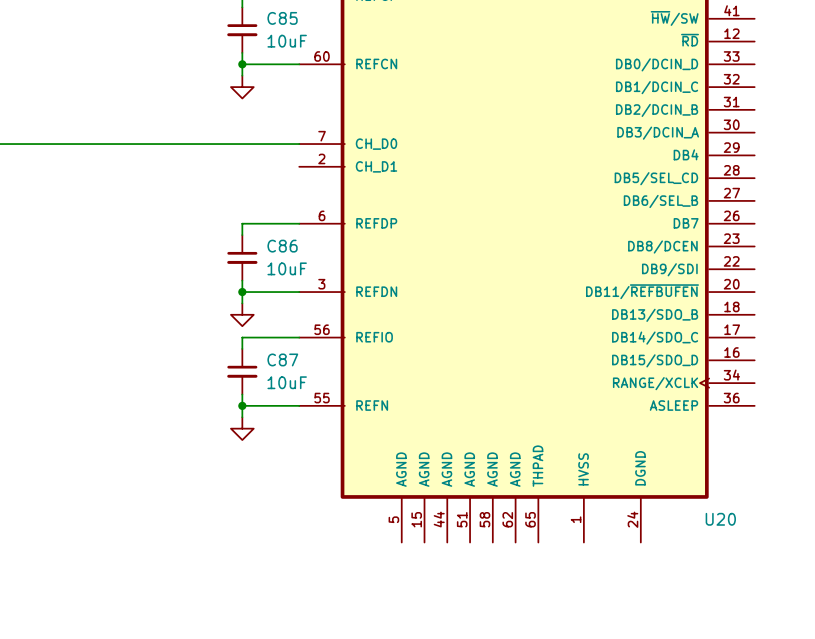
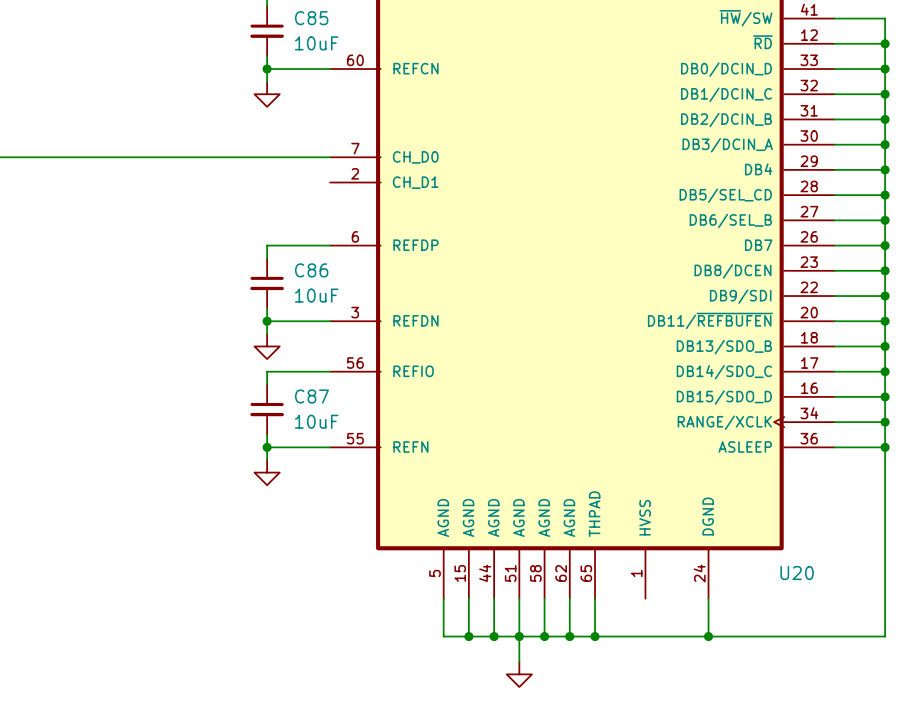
wire: none -> (834, 18) (885, 18) (885, 636) (443, 636) (443, 598)
wire: none -> (834, 43) (885, 43)
junction: none -> (885, 43)
wire: none -> (834, 69) (885, 69)
junction: none -> (885, 69)
wire: none -> (834, 94) (885, 94)
junction: none -> (885, 94)
wire: none -> (834, 119) (885, 119)
junction: none -> (885, 119)
wire: none -> (834, 144) (885, 144)
junction: none -> (885, 144)
wire: none -> (834, 169) (885, 169)
junction: none -> (885, 169)
wire: none -> (834, 195) (885, 195)
junction: none -> (885, 195)
wire: none -> (834, 220) (885, 220)
junction: none -> (885, 220)
wire: none -> (834, 245) (885, 245)
junction: none -> (885, 245)
wire: none -> (834, 270) (885, 270)
junction: none -> (885, 270)
wire: none -> (834, 296) (885, 296)
junction: none -> (885, 296)
wire: none -> (834, 321) (885, 321)
junction: none -> (885, 321)
wire: none -> (834, 346) (885, 346)
junction: none -> (885, 346)
wire: none -> (834, 371) (885, 371)
junction: none -> (885, 371)
wire: none -> (834, 396) (885, 396)
junction: none -> (885, 396)
wire: none -> (834, 422) (885, 422)
junction: none -> (885, 422)
wire: none -> (834, 447) (885, 447)
junction: none -> (885, 447)
wire: none -> (468, 598) (468, 636)
wire: none -> (494, 598) (494, 636)
wire: none -> (519, 598) (519, 661)
wire: none -> (544, 598) (544, 636)
wire: none -> (569, 598) (569, 636)
wire: none -> (595, 598) (595, 636)
wire: none -> (708, 598) (708, 636)
junction: none -> (468, 636)
junction: none -> (494, 636)
junction: none -> (519, 636)
junction: none -> (544, 636)
junction: none -> (569, 636)
junction: none -> (595, 636)
junction: none -> (708, 636)
power symbol: none -> (519, 674)

